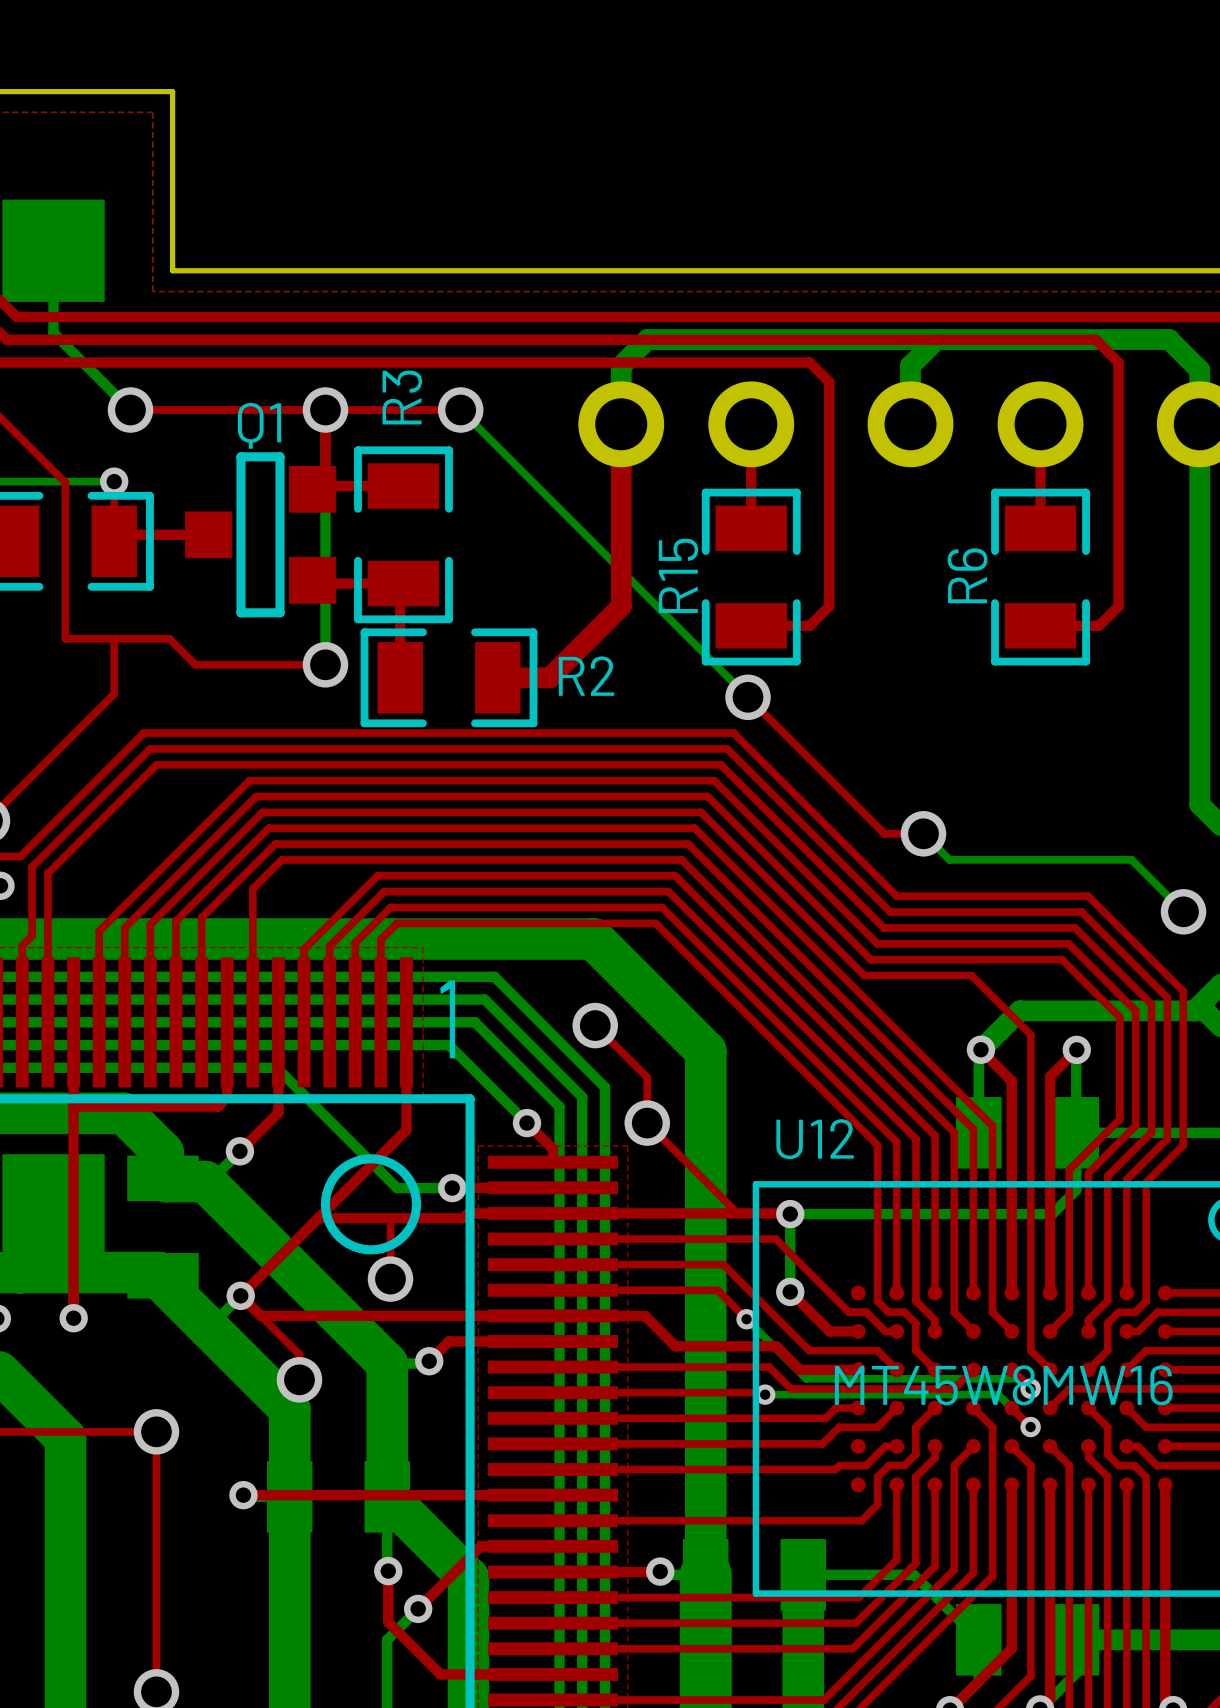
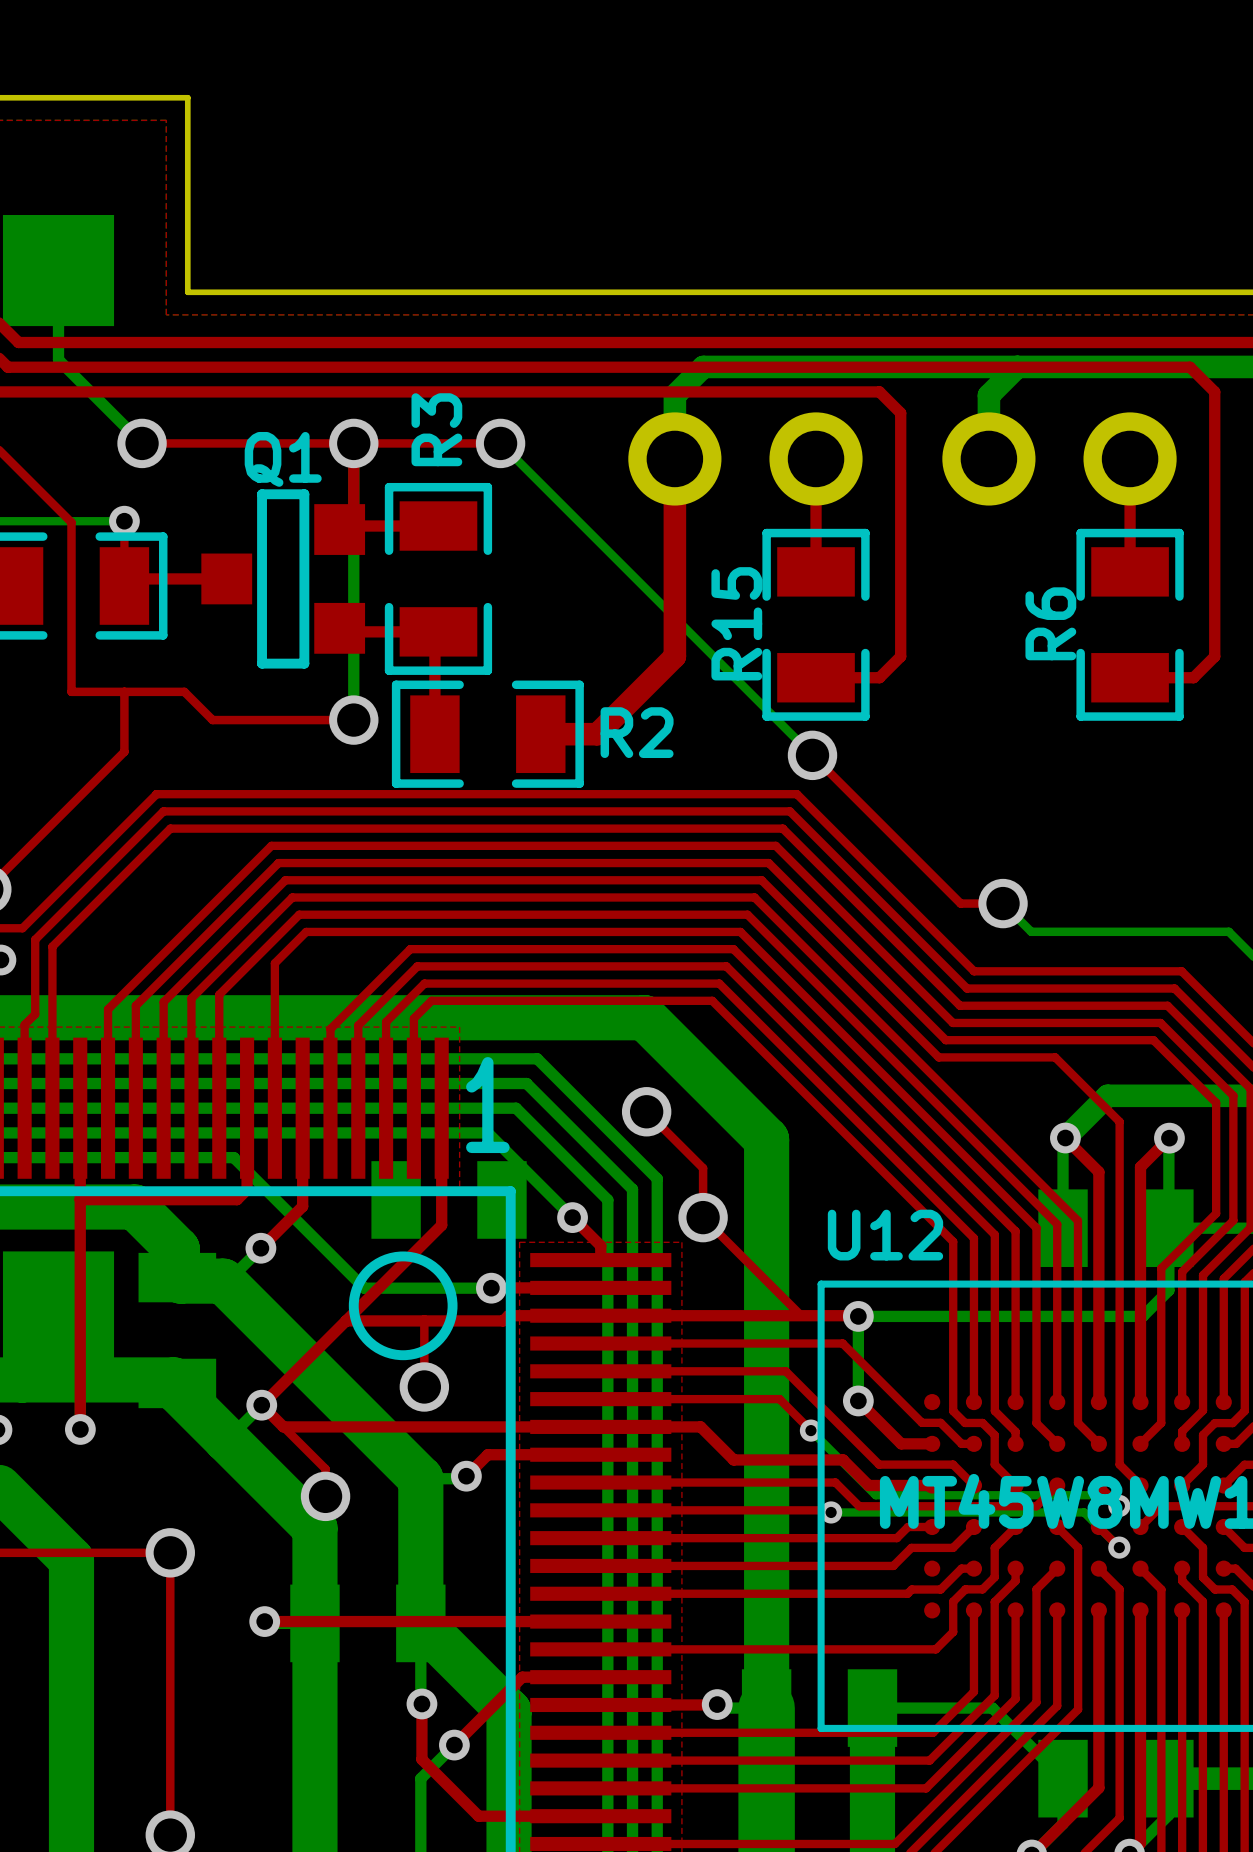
bottom track: (214, 1067) (276, 1067) (396, 1188) -> (233, 1157) (364, 1288) (431, 1288)
part: none -> (449, 1199)

